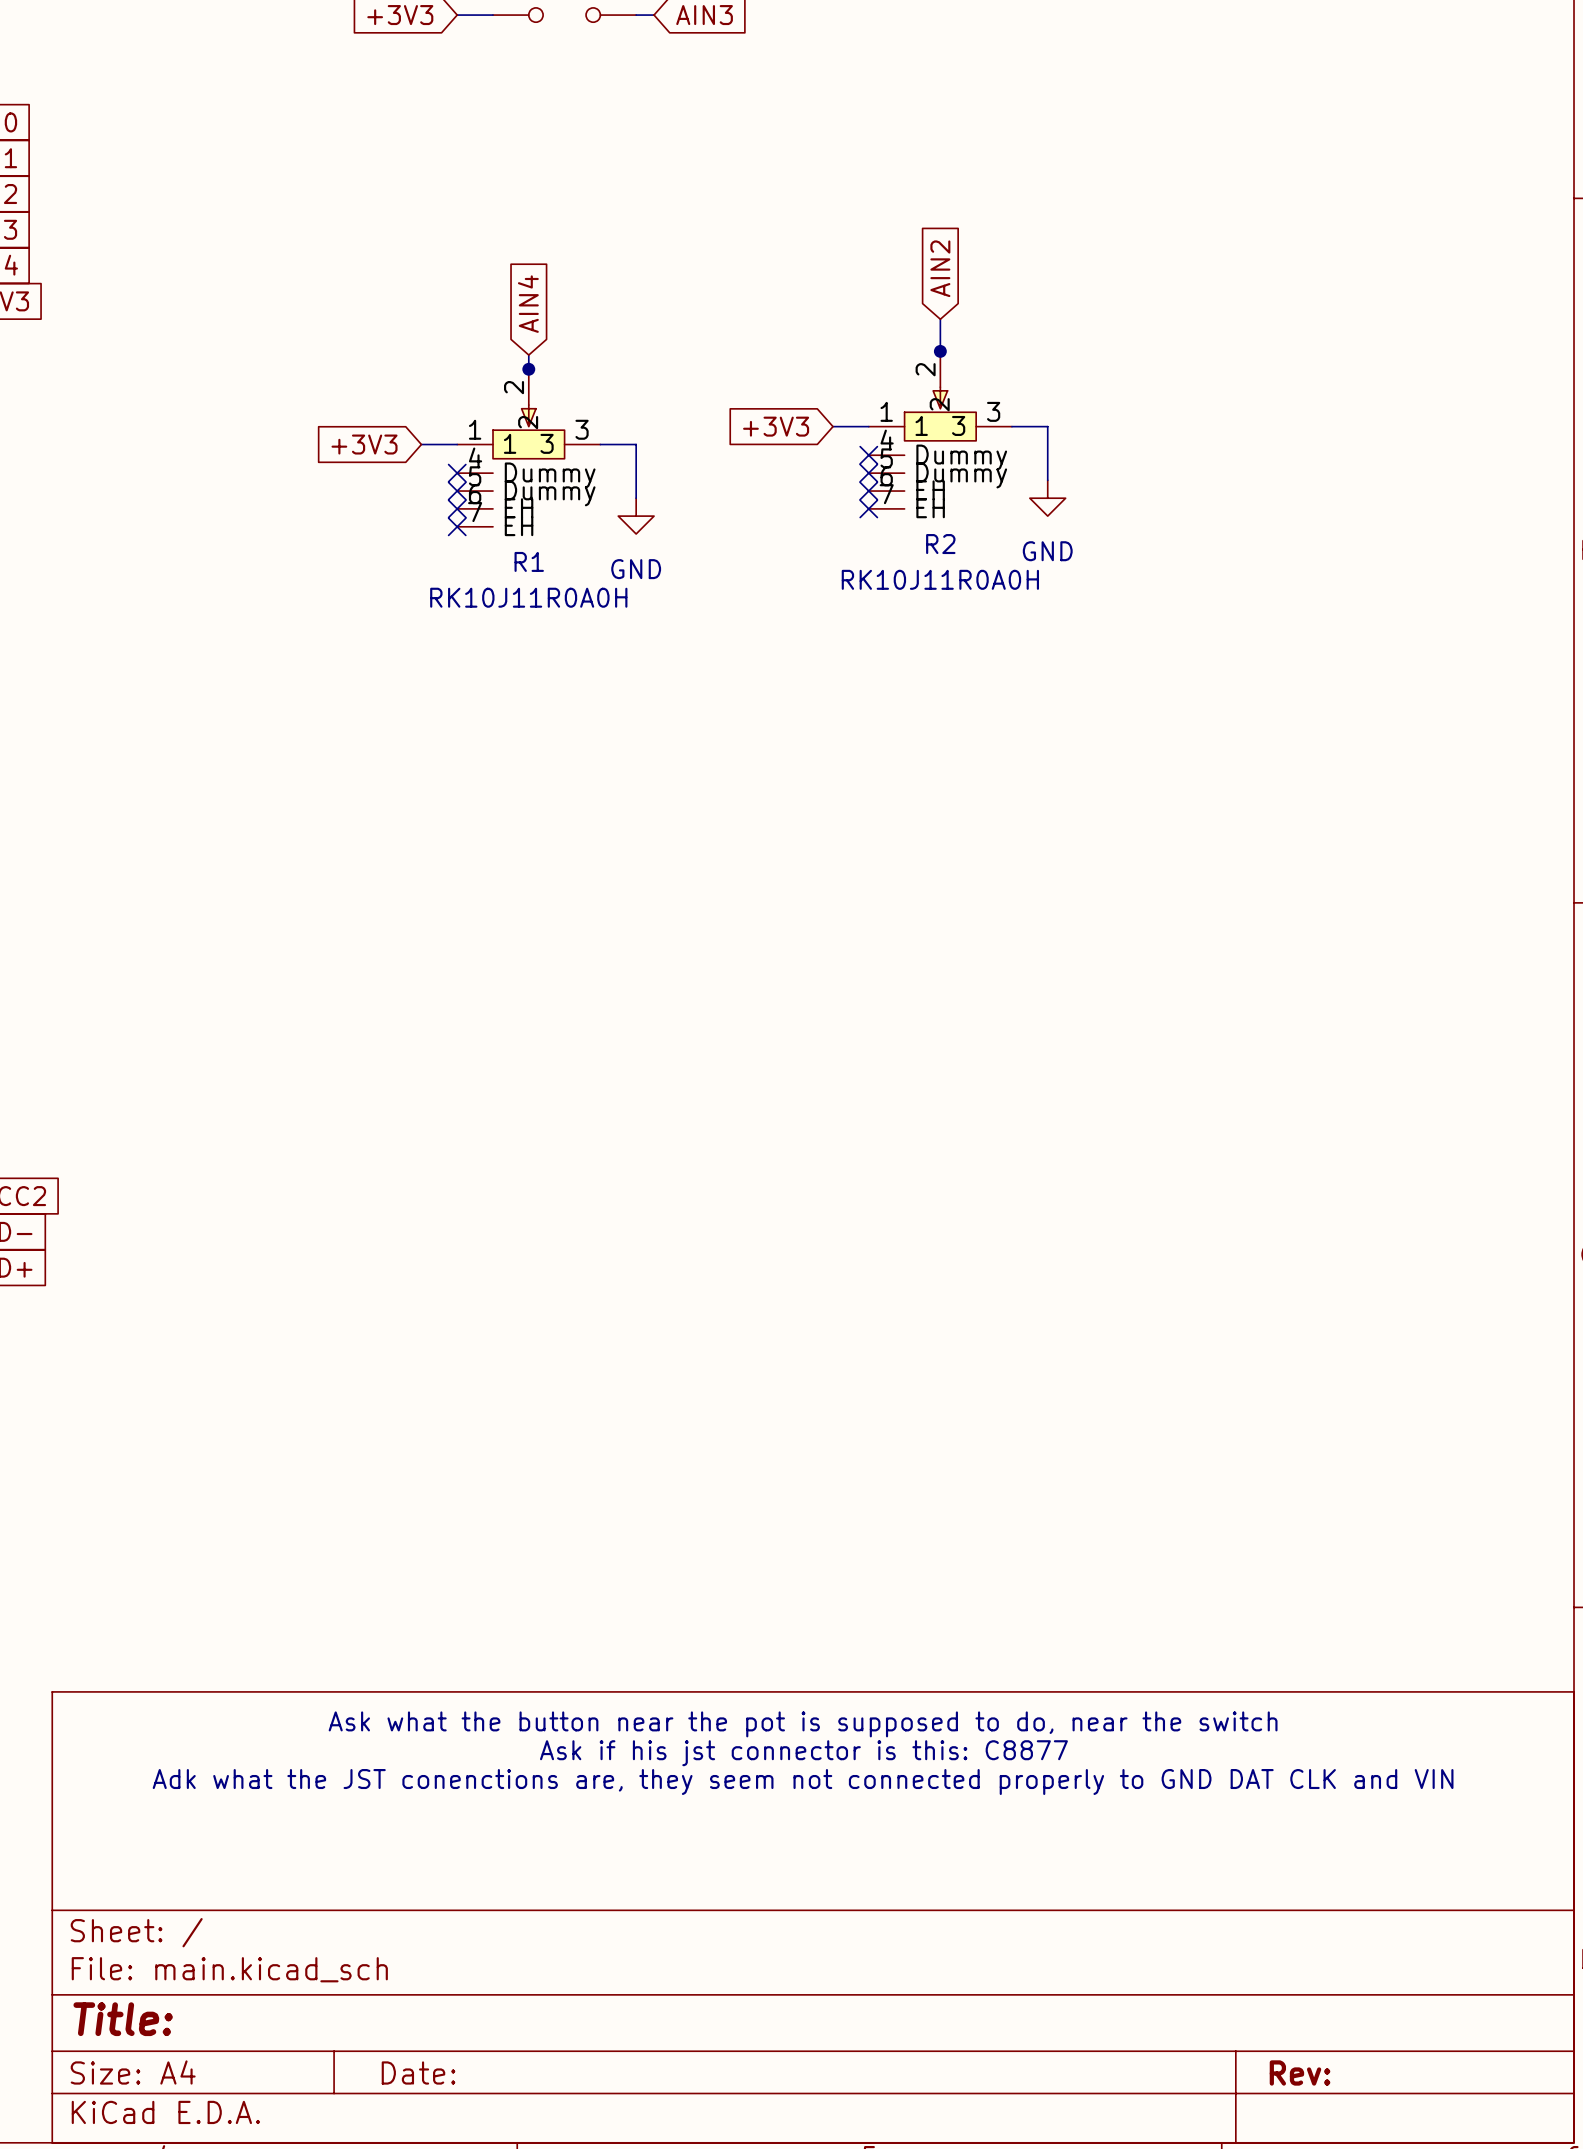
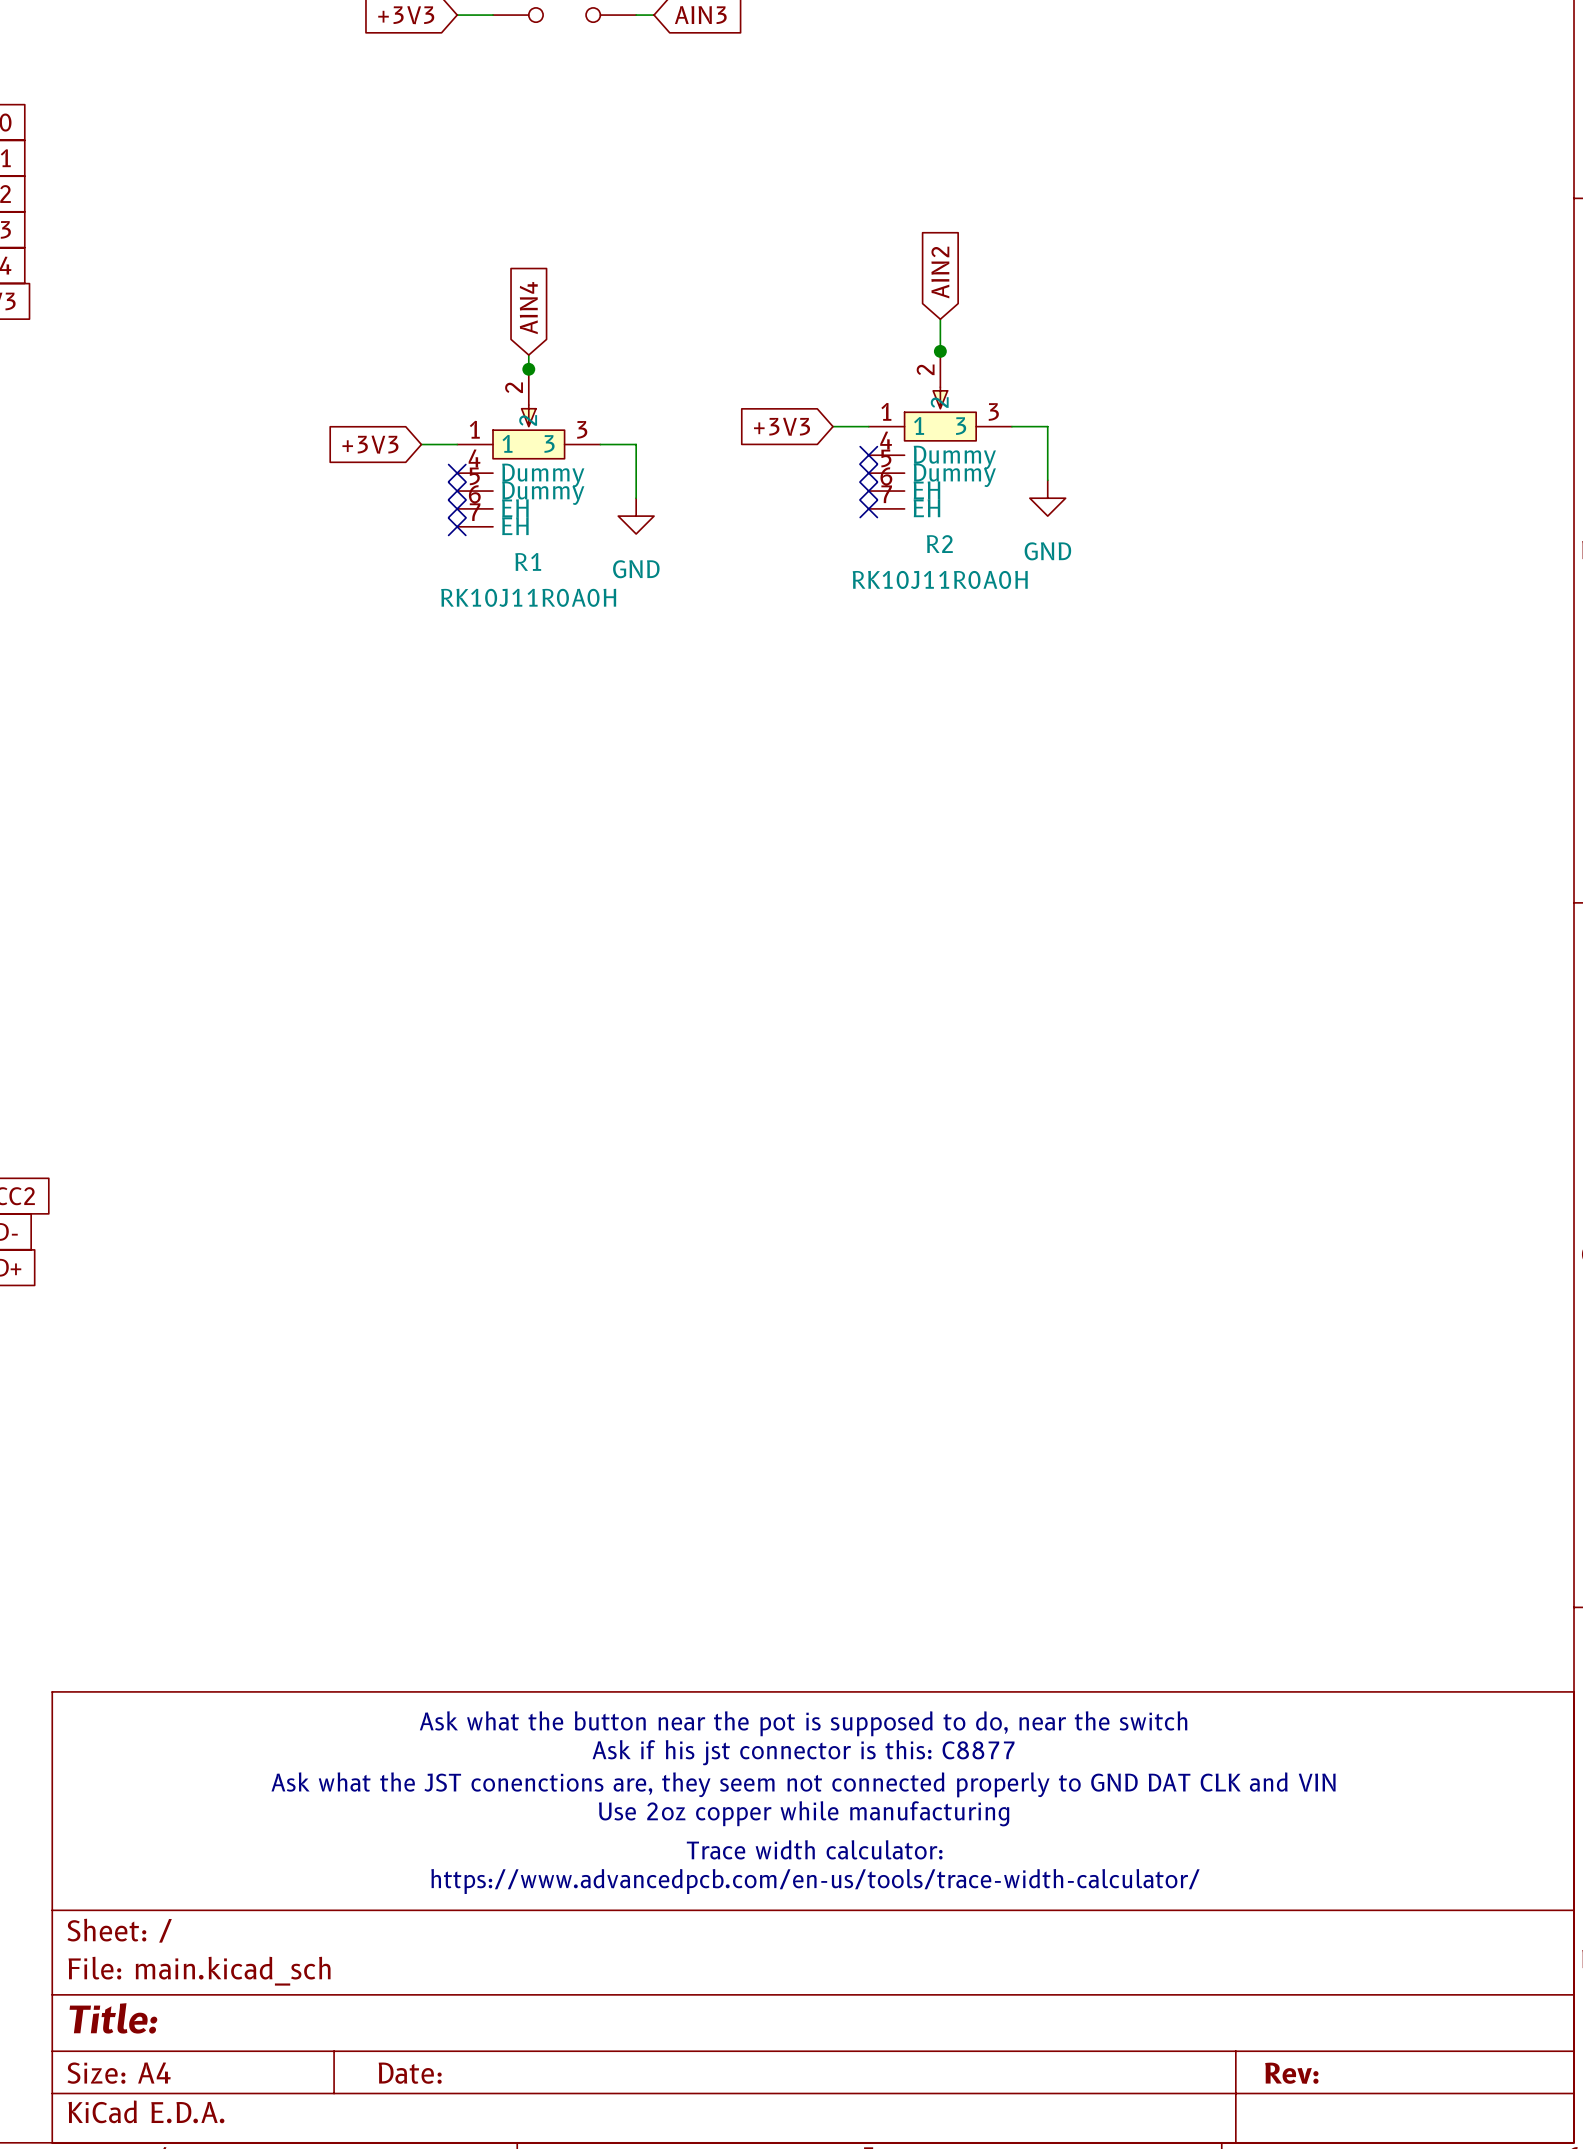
text: Adk what the JST conenctions are, they seem not connected properly to GND DAT CLK and VIN (803, 1782) -> Ask what the JST conenctions are, they seem not connected properly to GND DAT CLK and VIN (803, 1784)
text: none -> Use 2oz copper while manufacturing (804, 1813)
text: none -> Trace width calculator: (814, 1849)
text: none -> https://www.advancedpcb.com/en-us/tools/trace-width-calculator/ (815, 1881)

